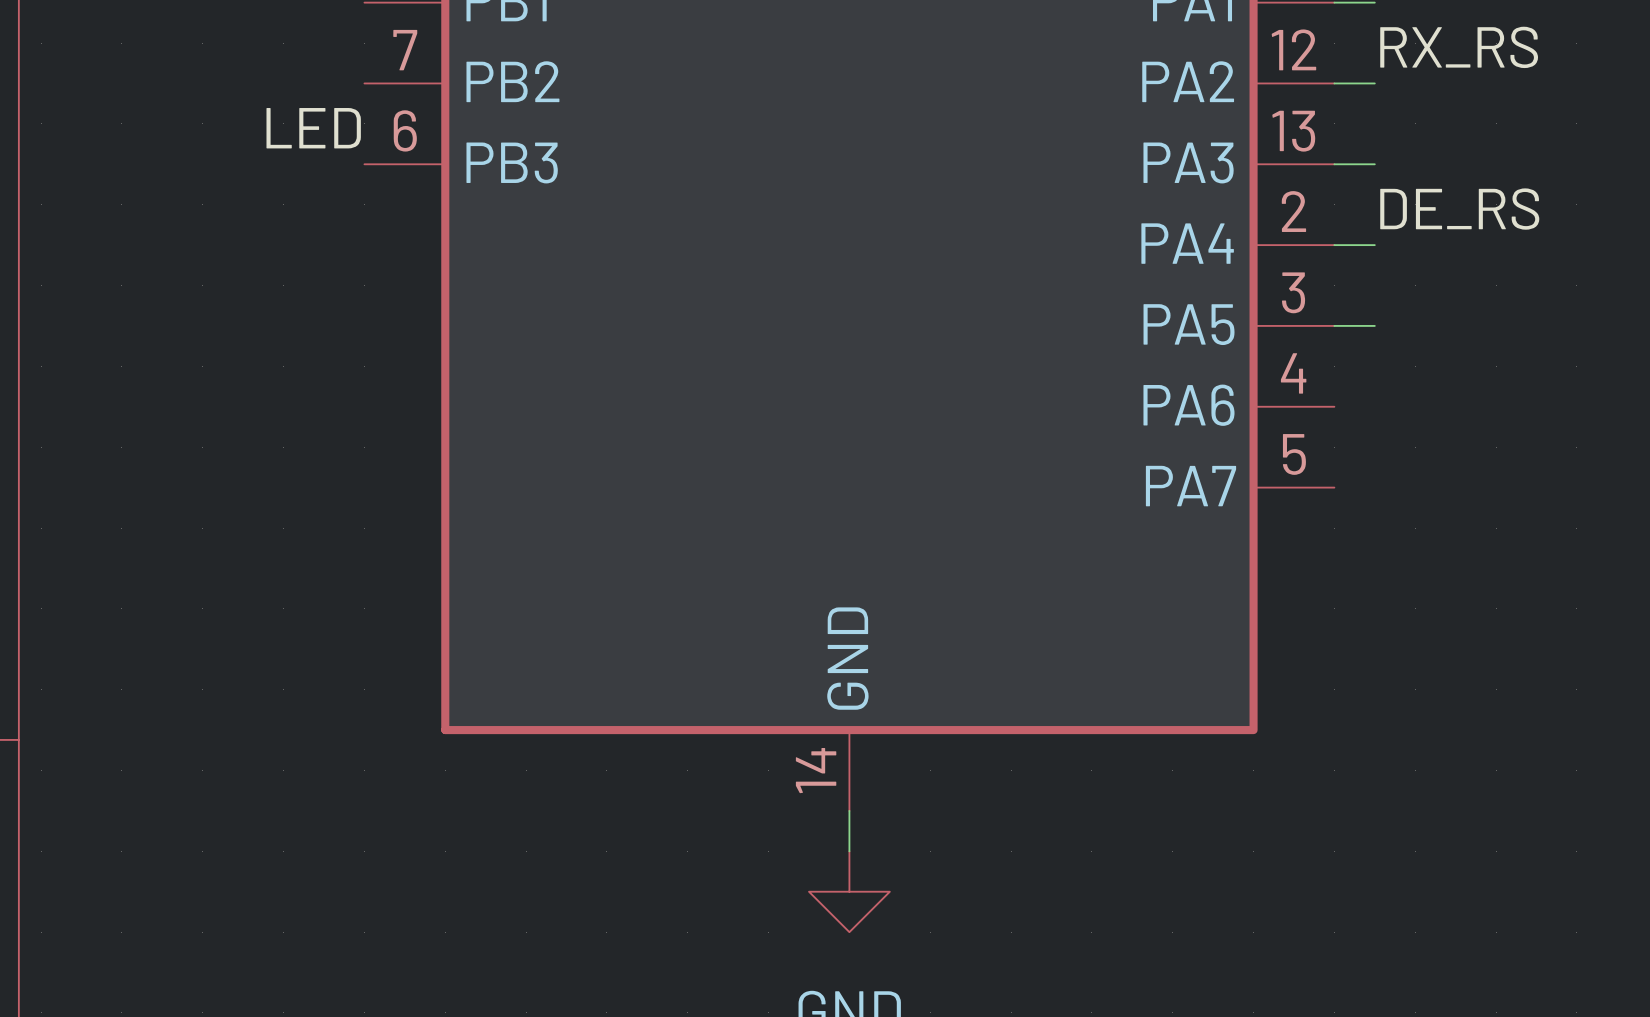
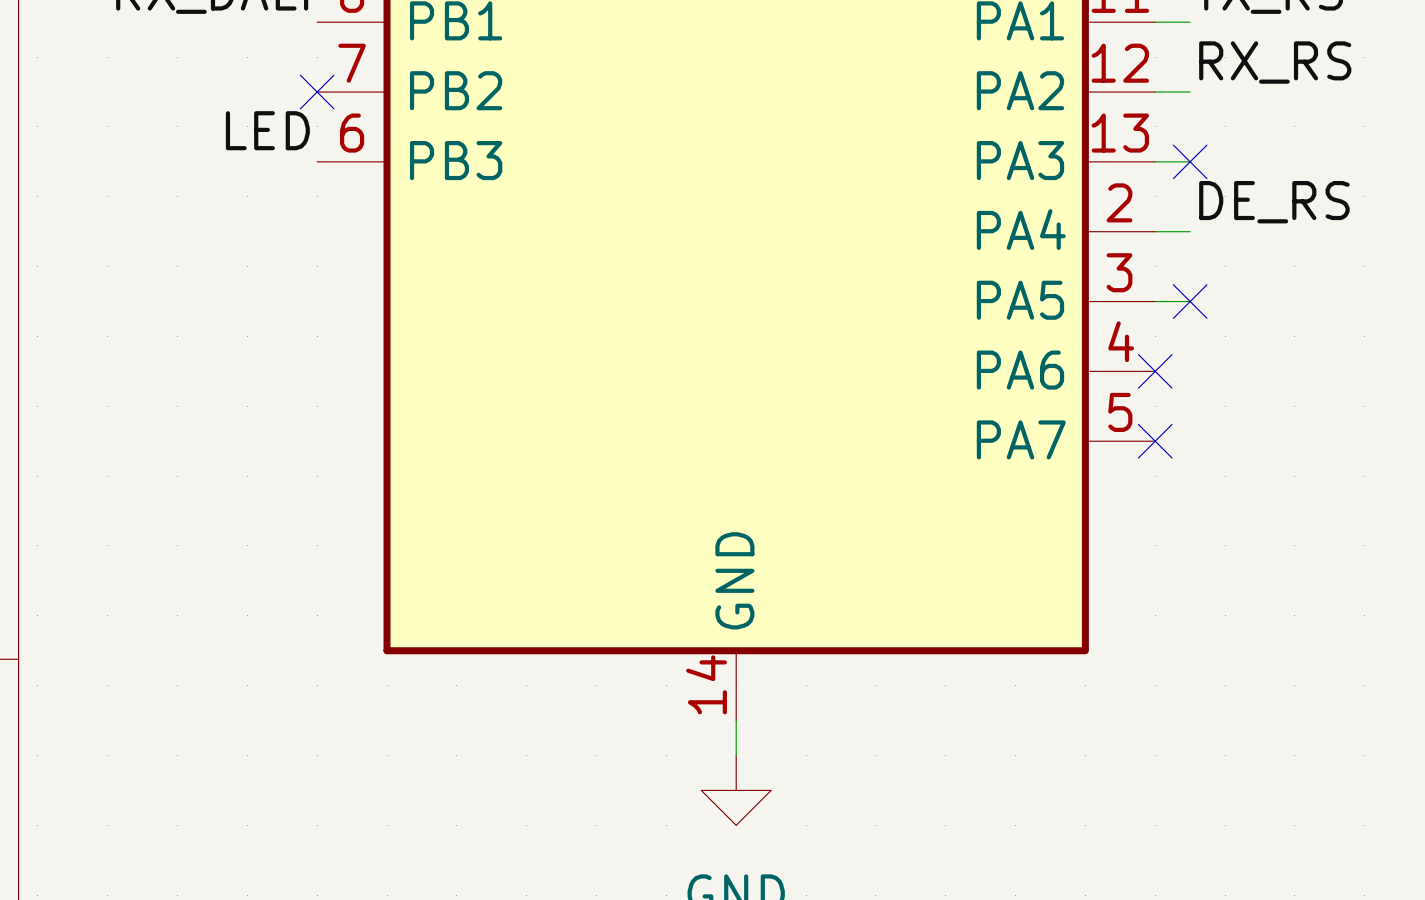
no-connect mark: none -> (317, 92)
no-connect mark: none -> (1190, 161)
no-connect mark: none -> (1190, 301)
no-connect mark: none -> (1155, 371)
no-connect mark: none -> (1155, 441)

